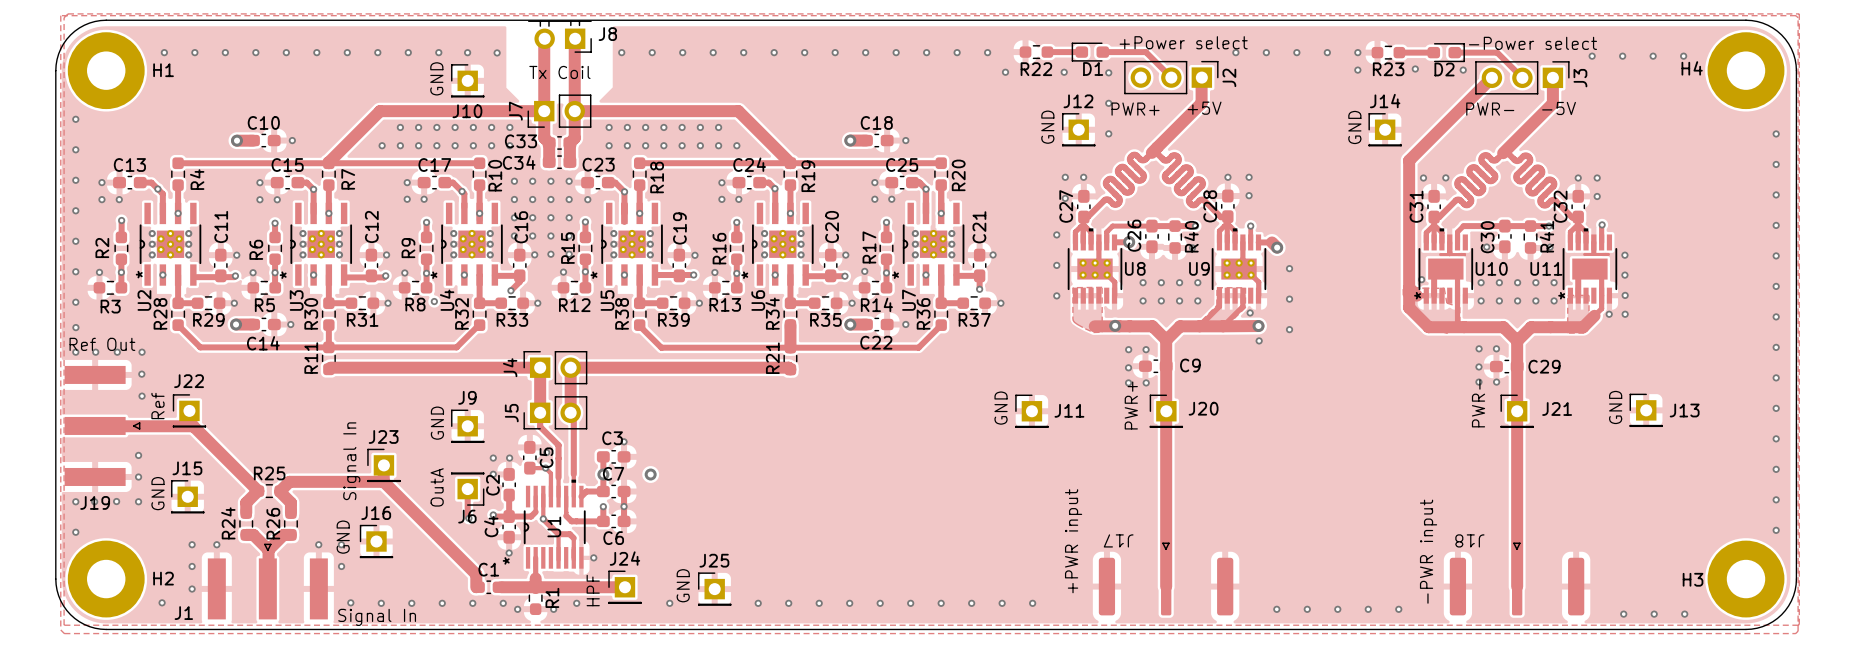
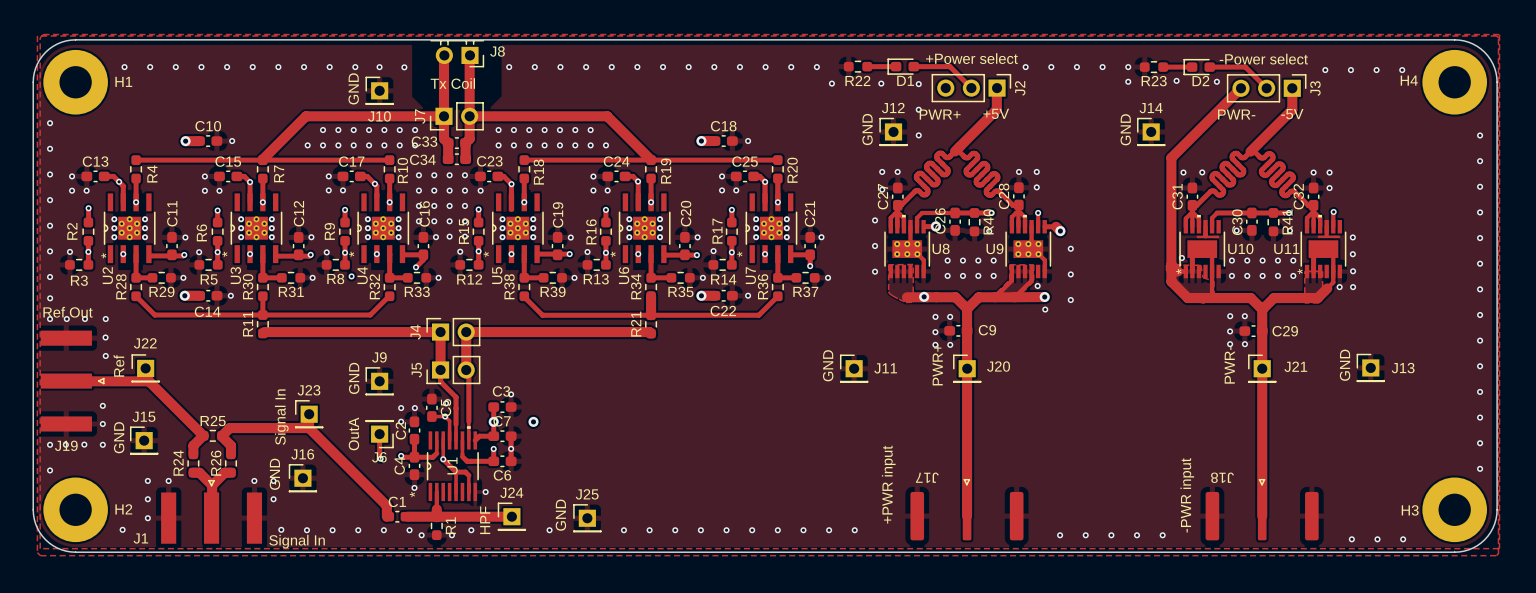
D2 rotation: 0° (1446, 52) -> 180° (1199, 67)

